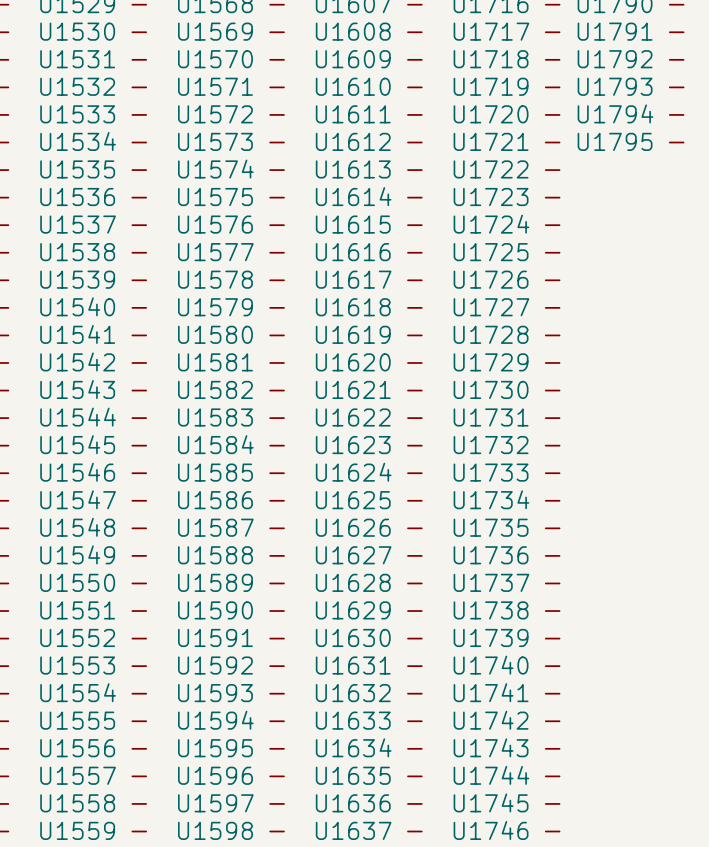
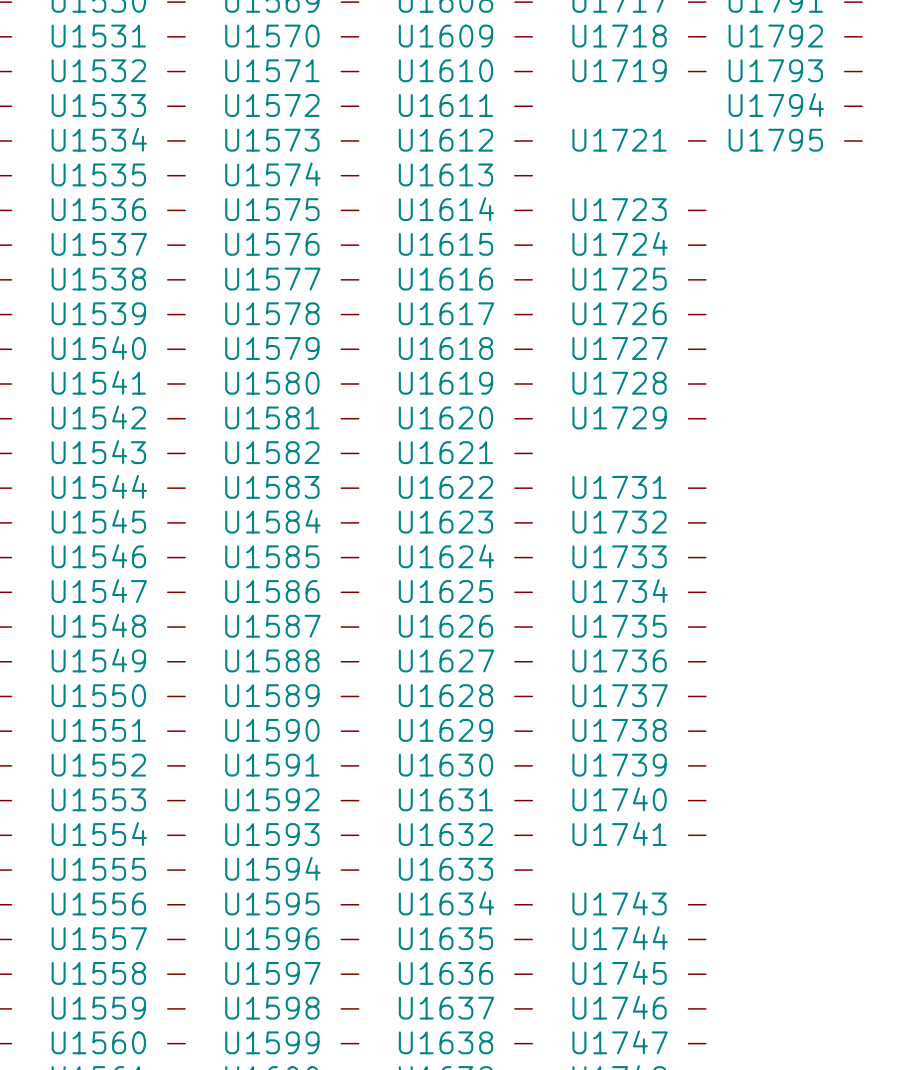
U1720: (552, 114) -> none
U1722: (552, 170) -> none
U1730: (552, 390) -> none
U1742: (552, 721) -> none

